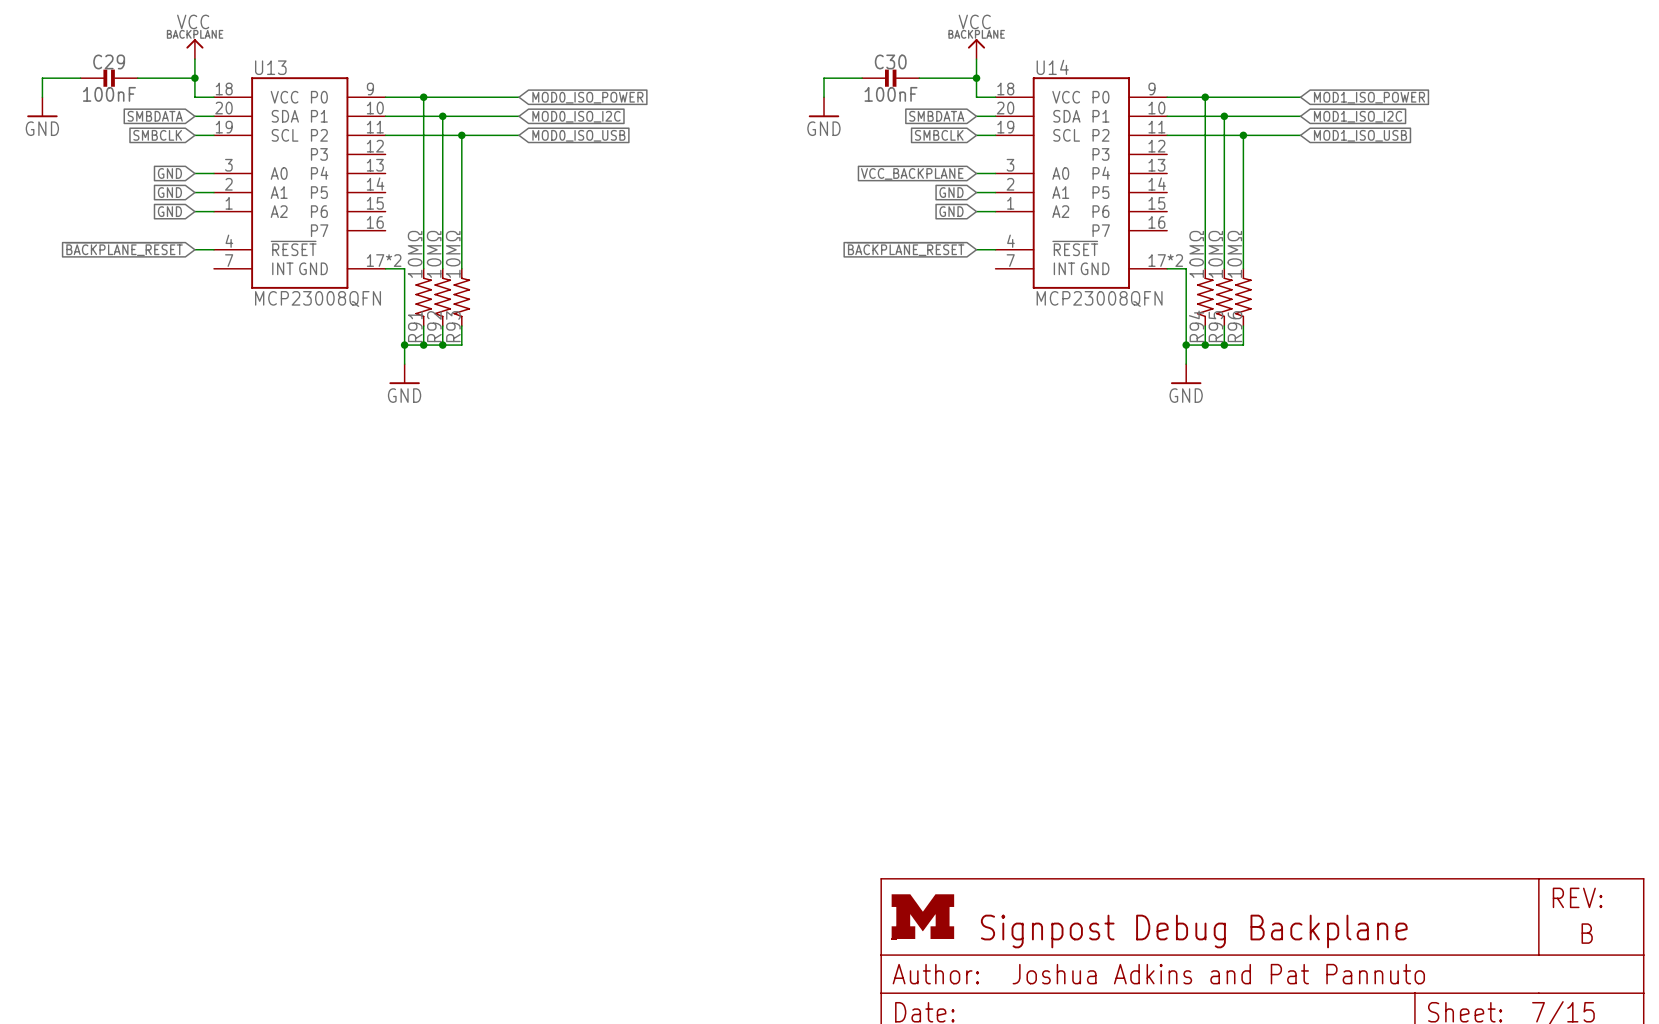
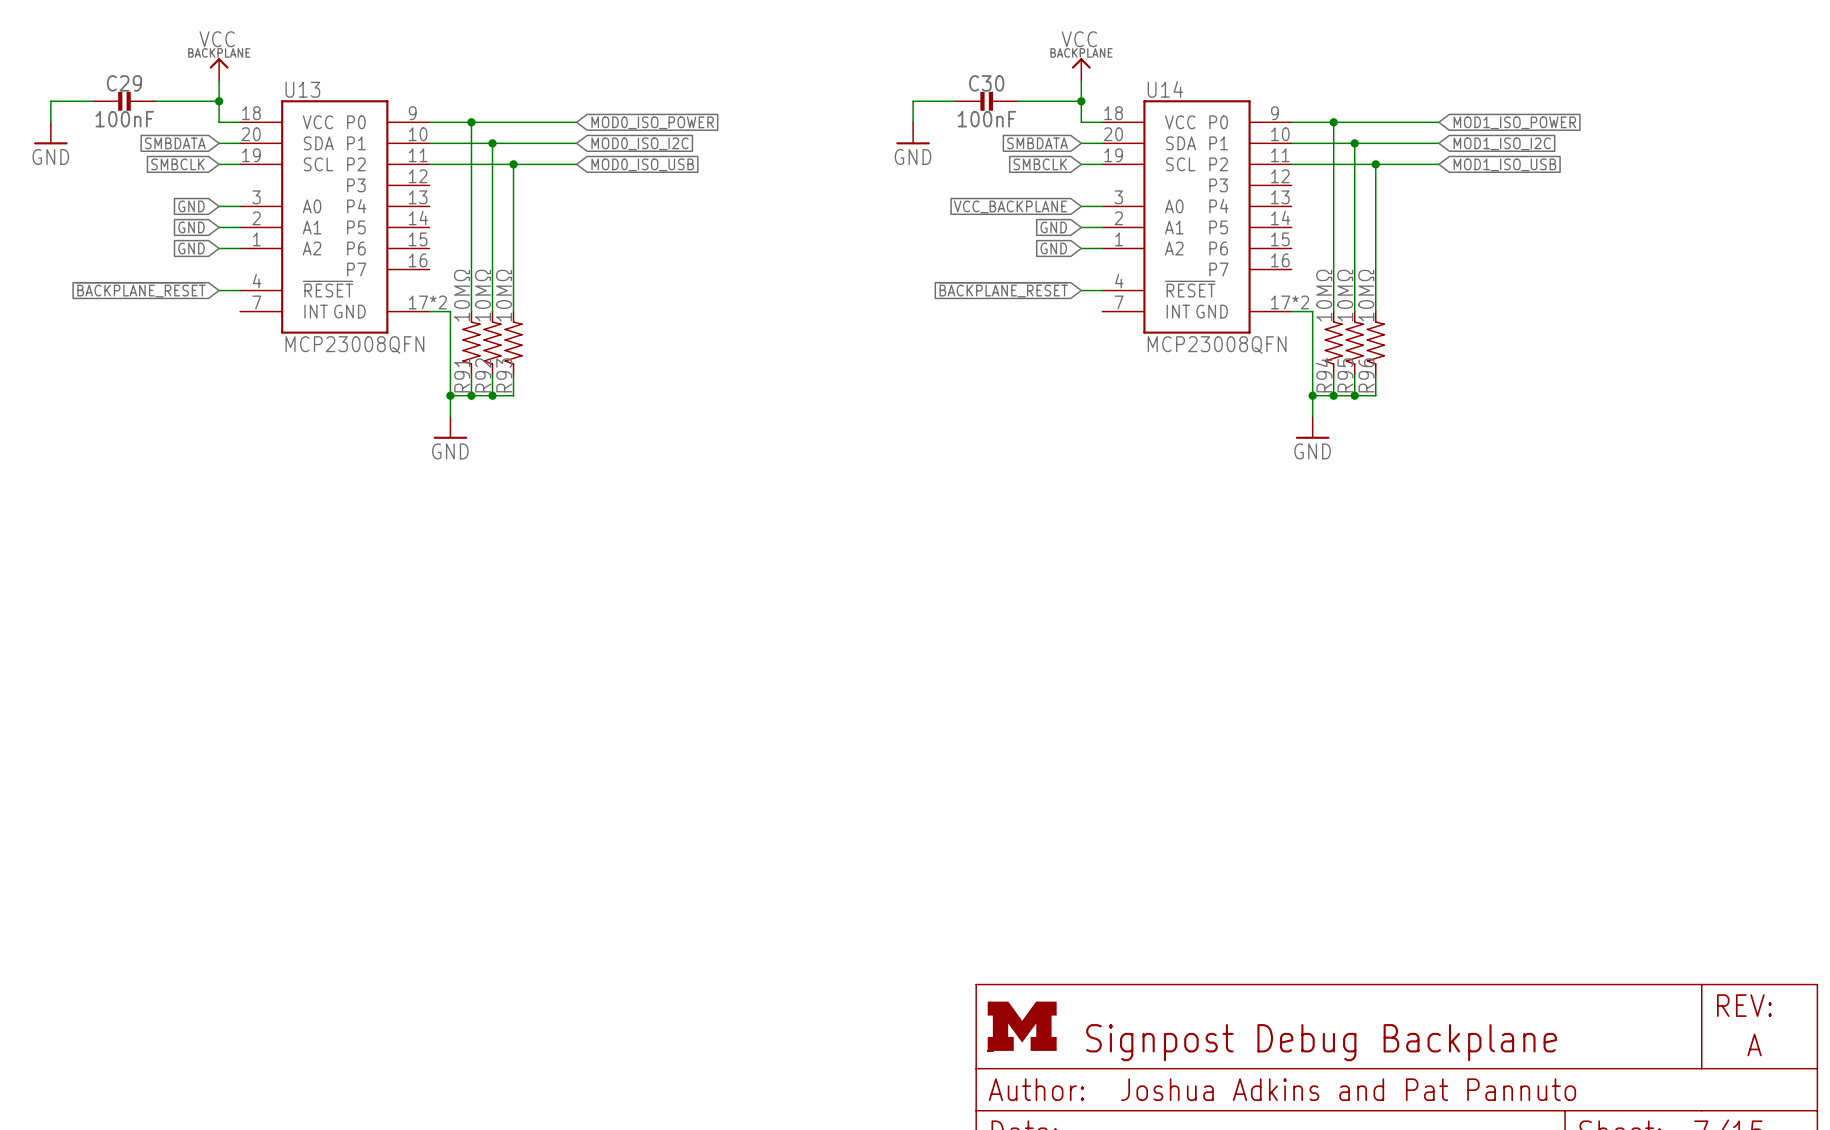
part text: B (1587, 933) -> A (1754, 1044)

